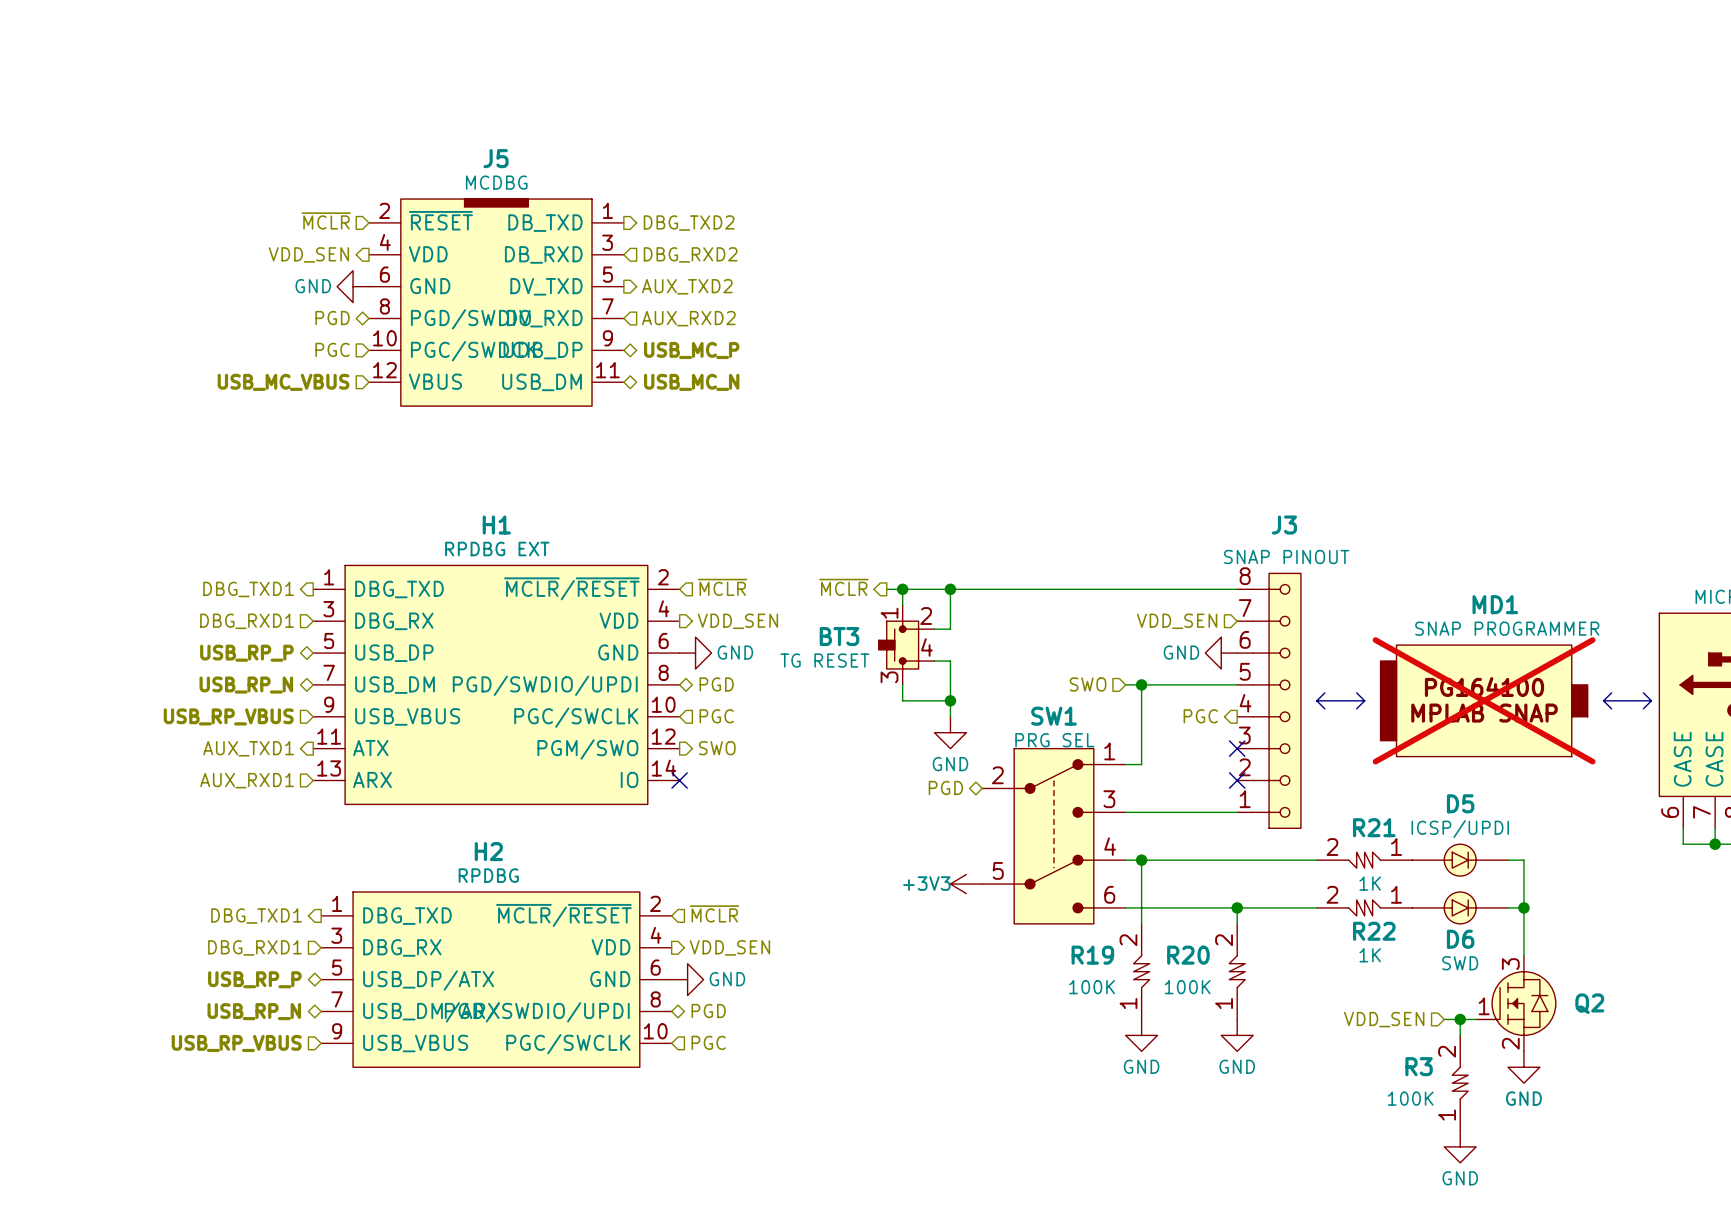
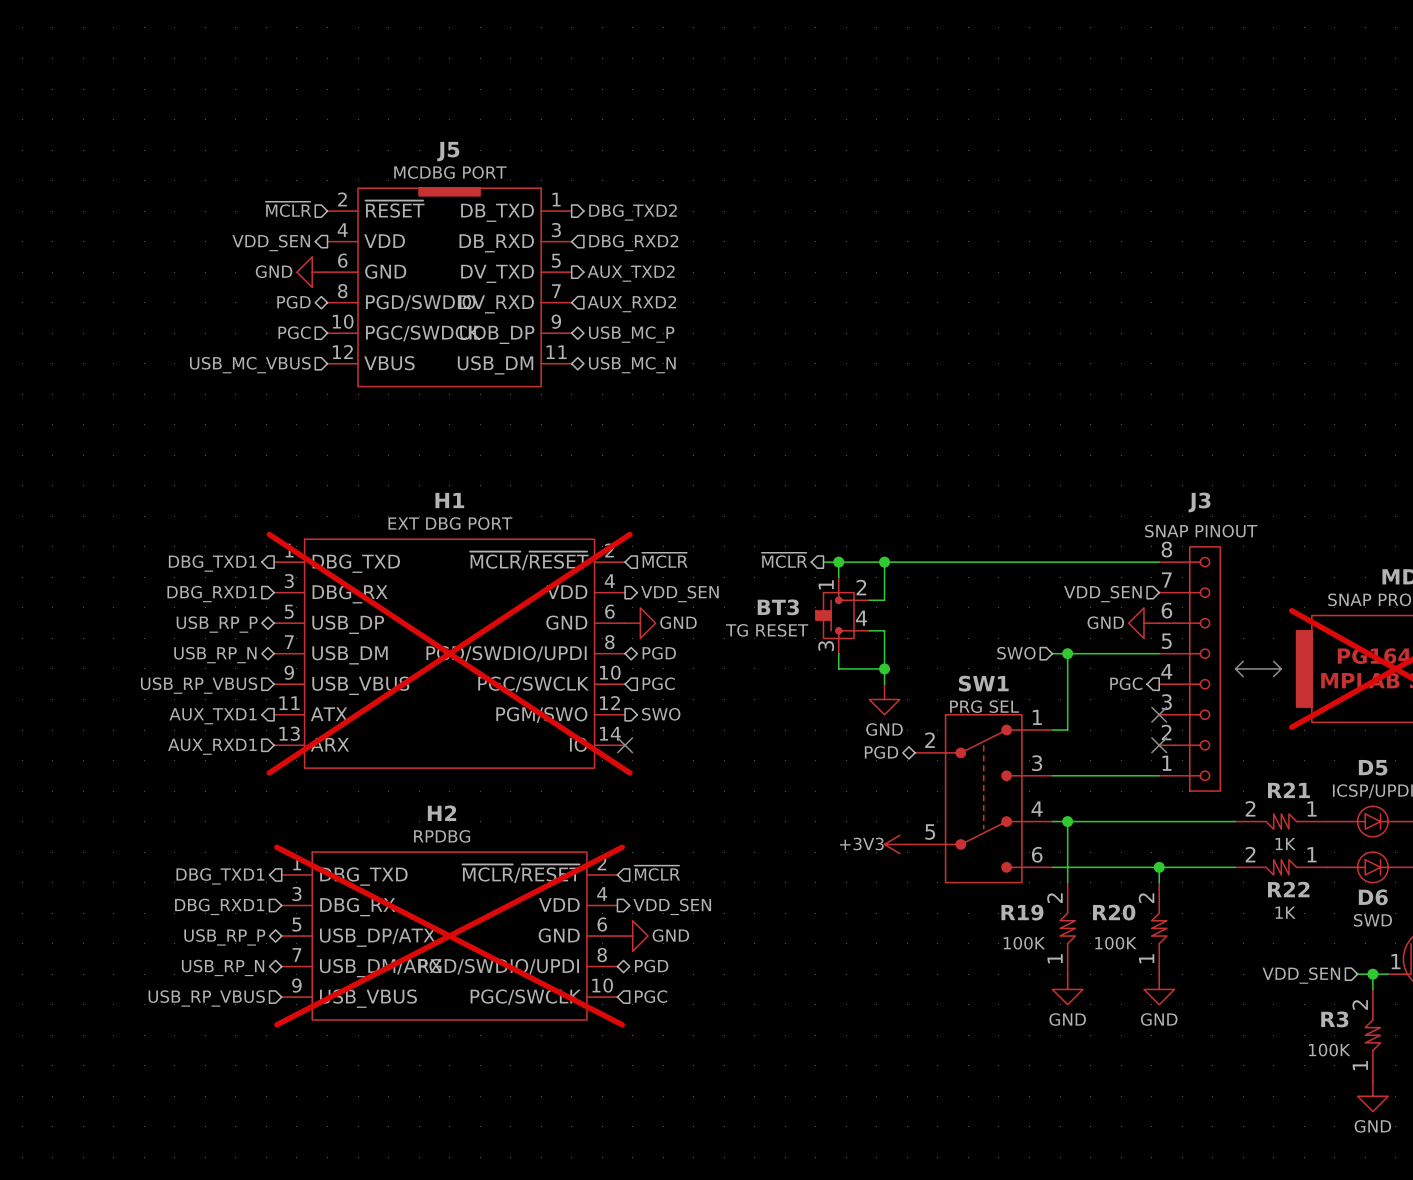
J5 value: MCDBG (496, 182) -> MCDBG PORT (450, 172)
H1 value: RPDBG EXT (497, 549) -> EXT DBG PORT (450, 523)
H1 do-not-place cross: none -> (449, 653)
H2 do-not-place cross: none -> (449, 936)

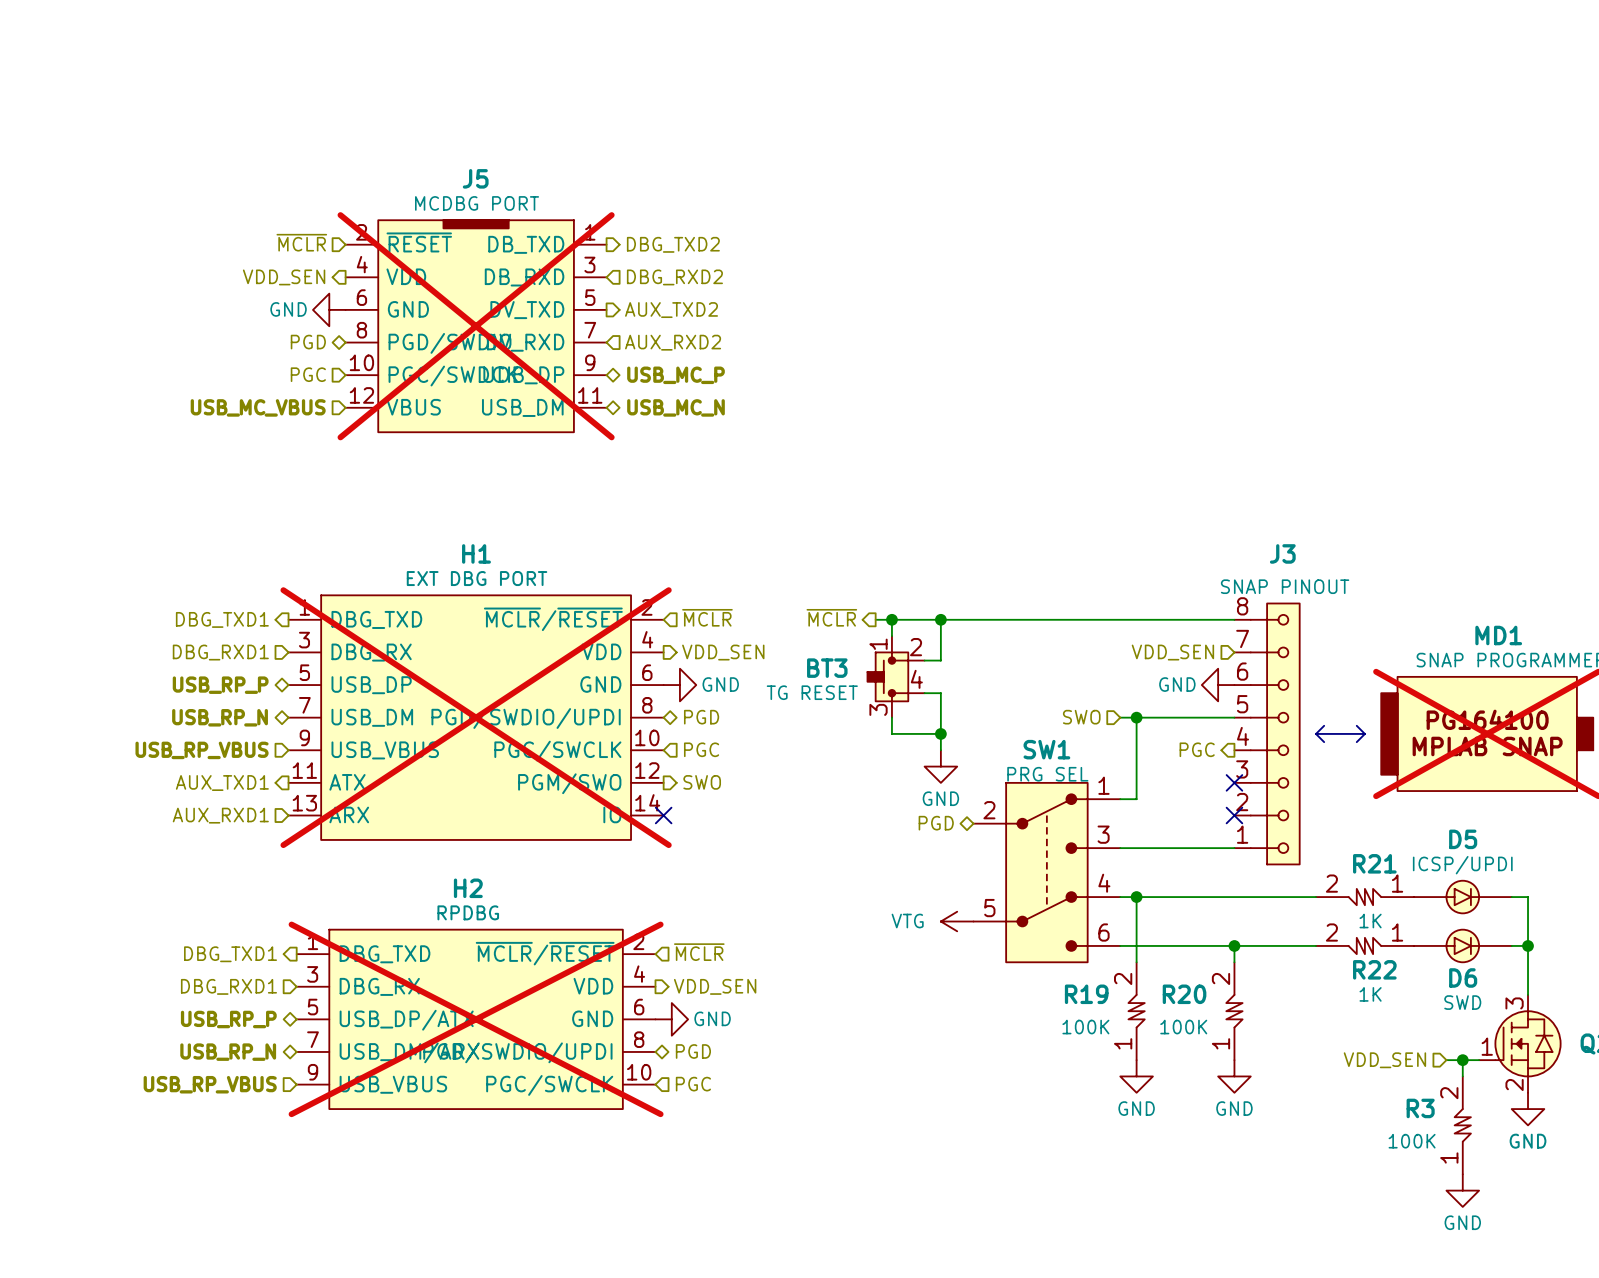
J5 do-not-place cross: none -> (476, 326)
power symbol: +3V3 (899, 844) -> VTG (957, 921)

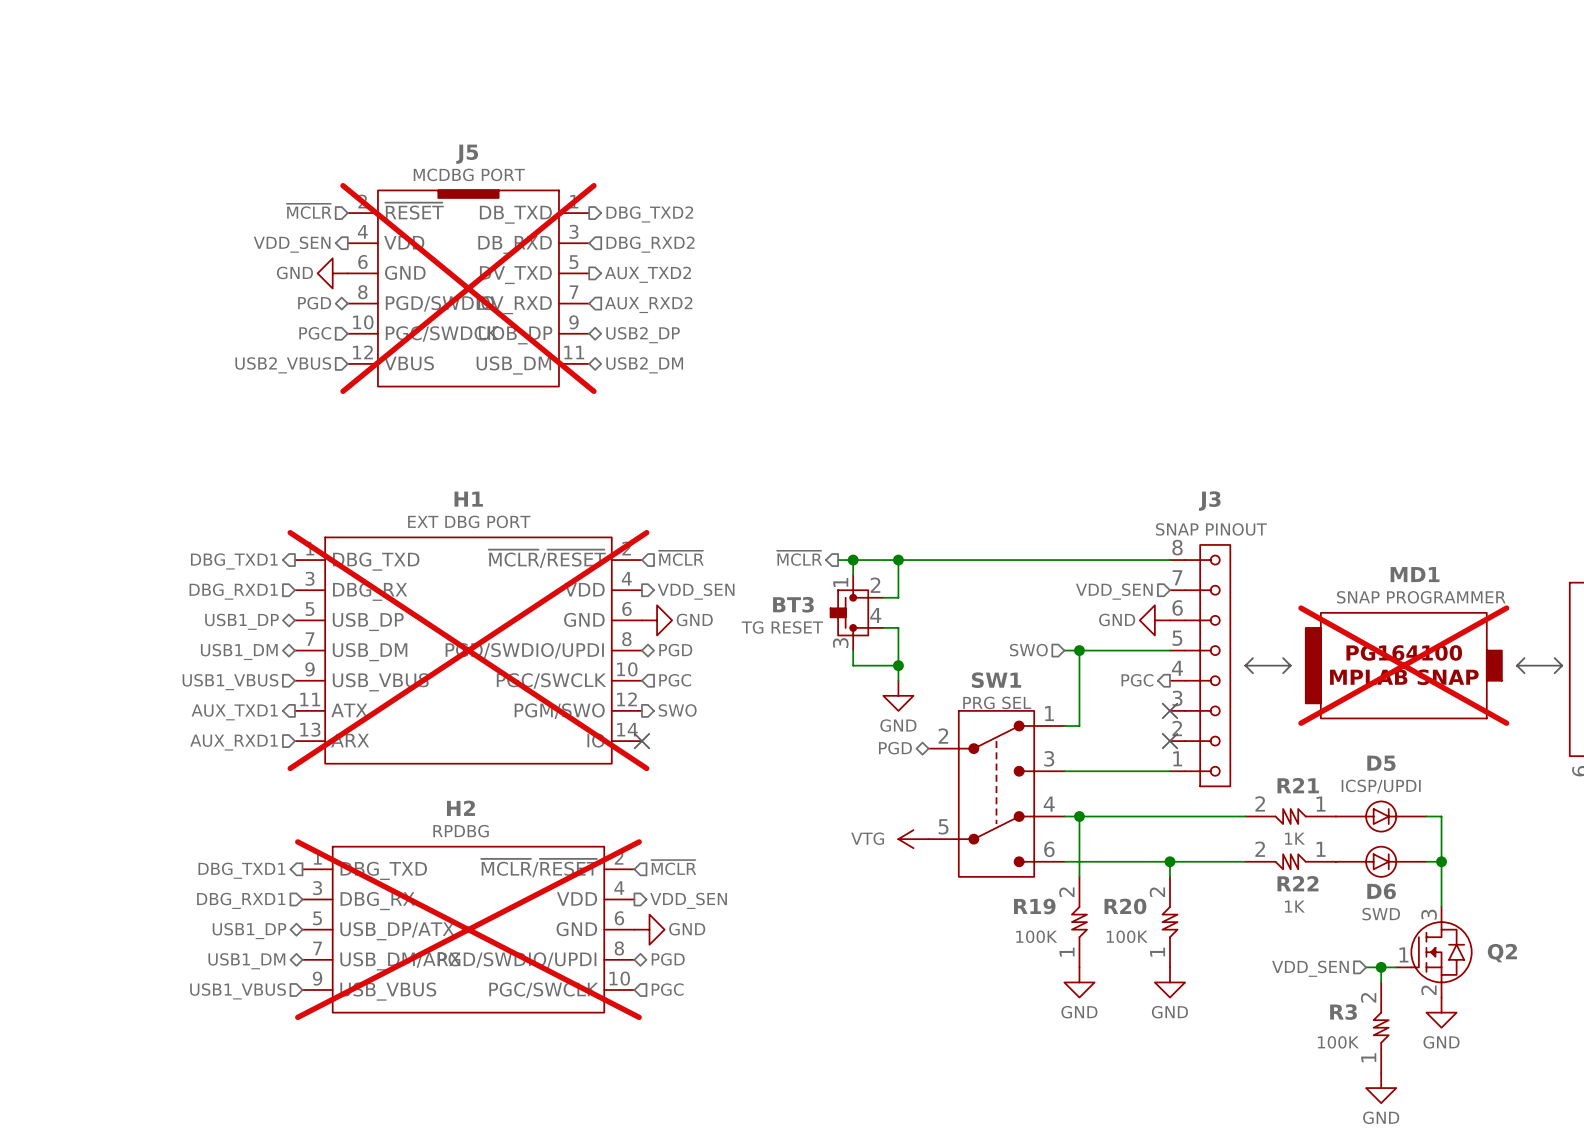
hierarchical label: USB_MC_P (675, 375) -> USB2_DP (643, 335)
hierarchical label: USB_MC_VBUS (258, 407) -> USB2_VBUS (283, 365)
hierarchical label: USB_MC_N (675, 407) -> USB2_DM (644, 365)
hierarchical label: USB_RP_P (220, 685) -> USB1_DP (241, 621)
hierarchical label: USB_RP_N (220, 717) -> USB1_DM (239, 651)
hierarchical label: USB_RP_VBUS (202, 750) -> USB1_VBUS (230, 682)
hierarchical label: USB_RP_P (228, 1019) -> USB1_DP (249, 931)
hierarchical label: USB_RP_N (228, 1052) -> USB1_DM (246, 961)
hierarchical label: USB_RP_VBUS (210, 1084) -> USB1_VBUS (238, 991)

